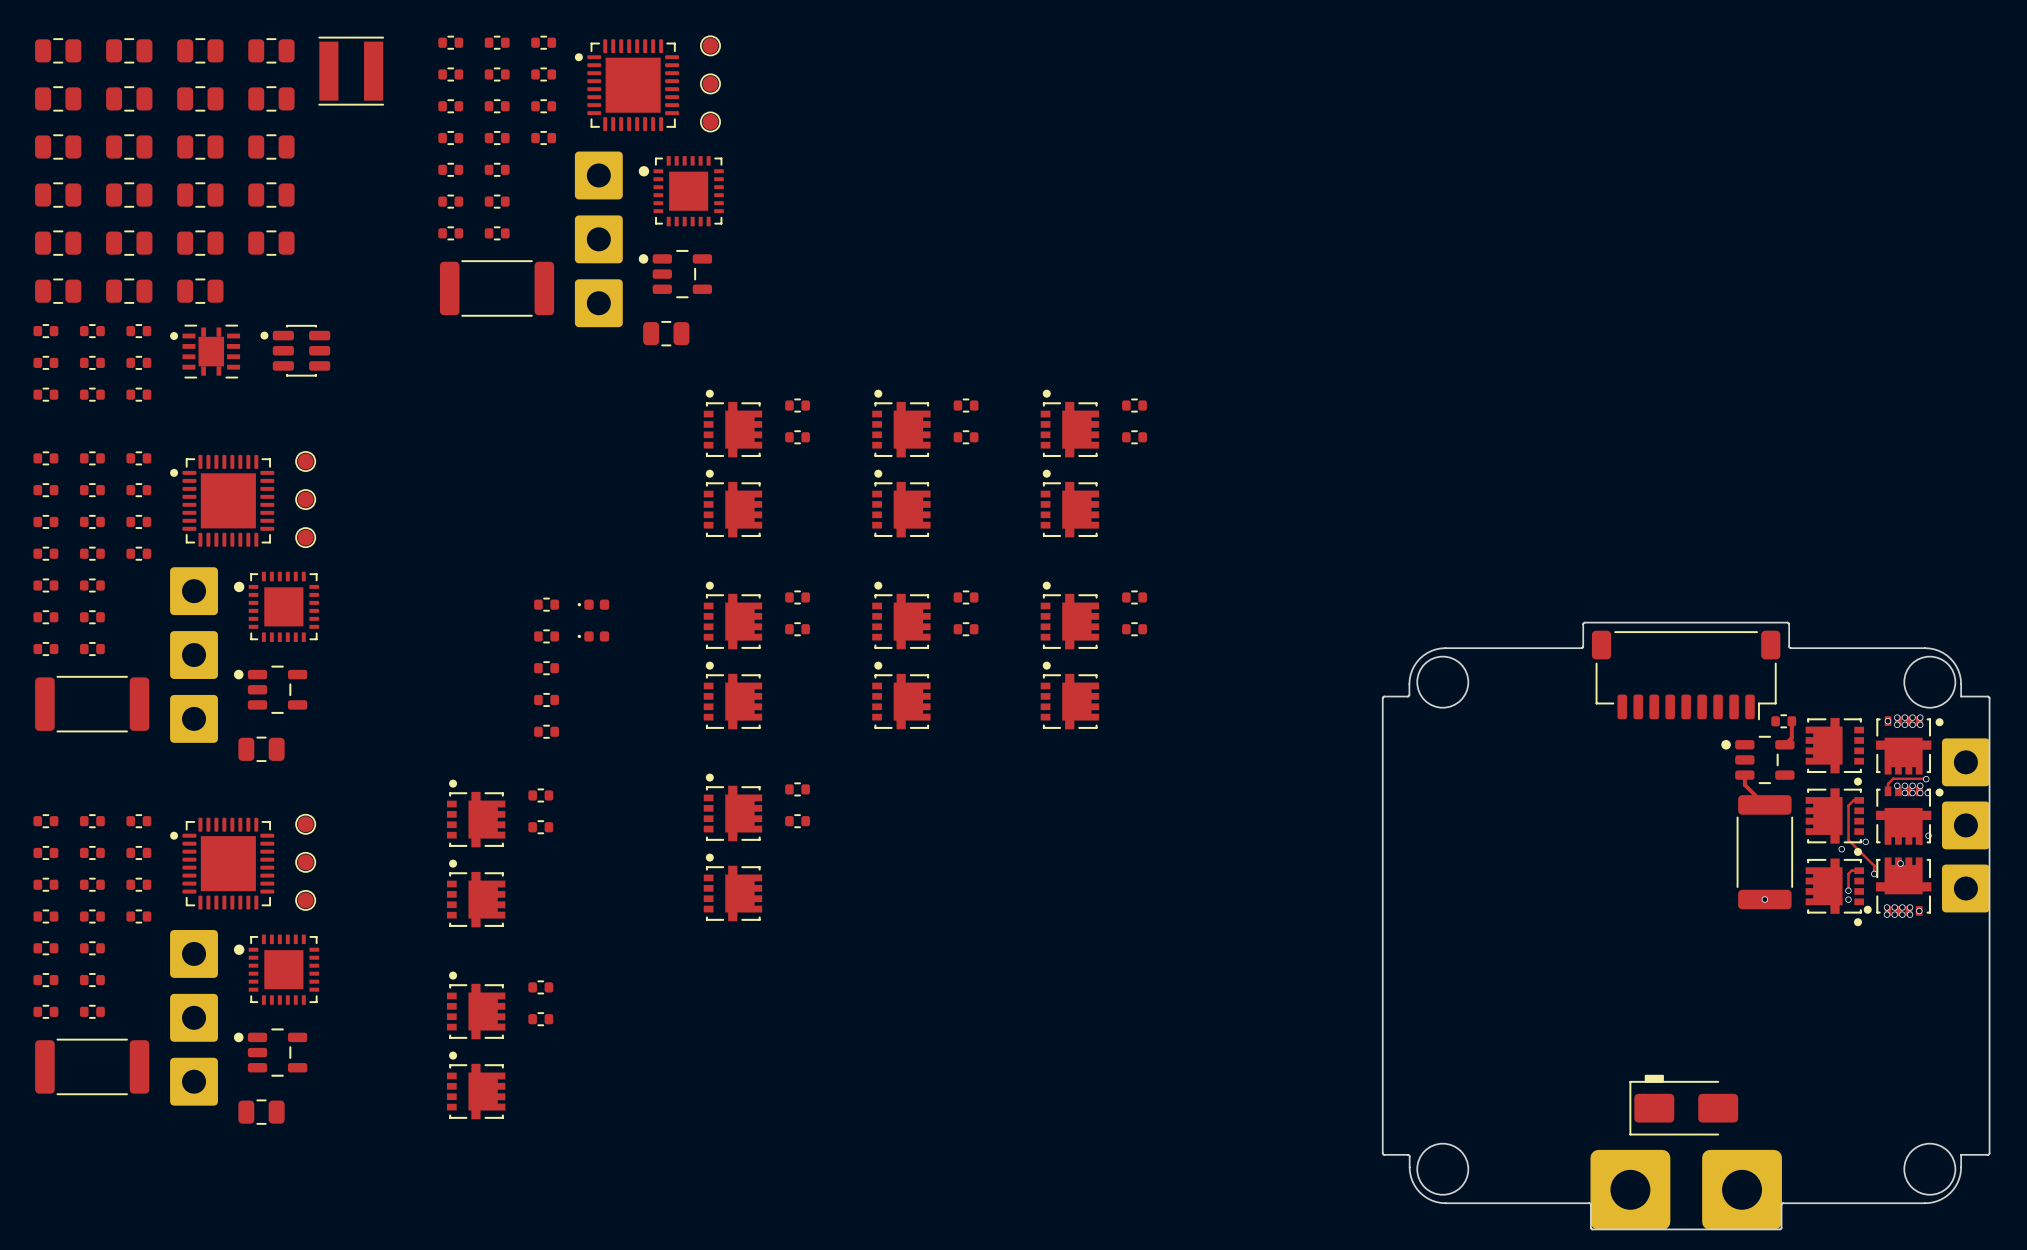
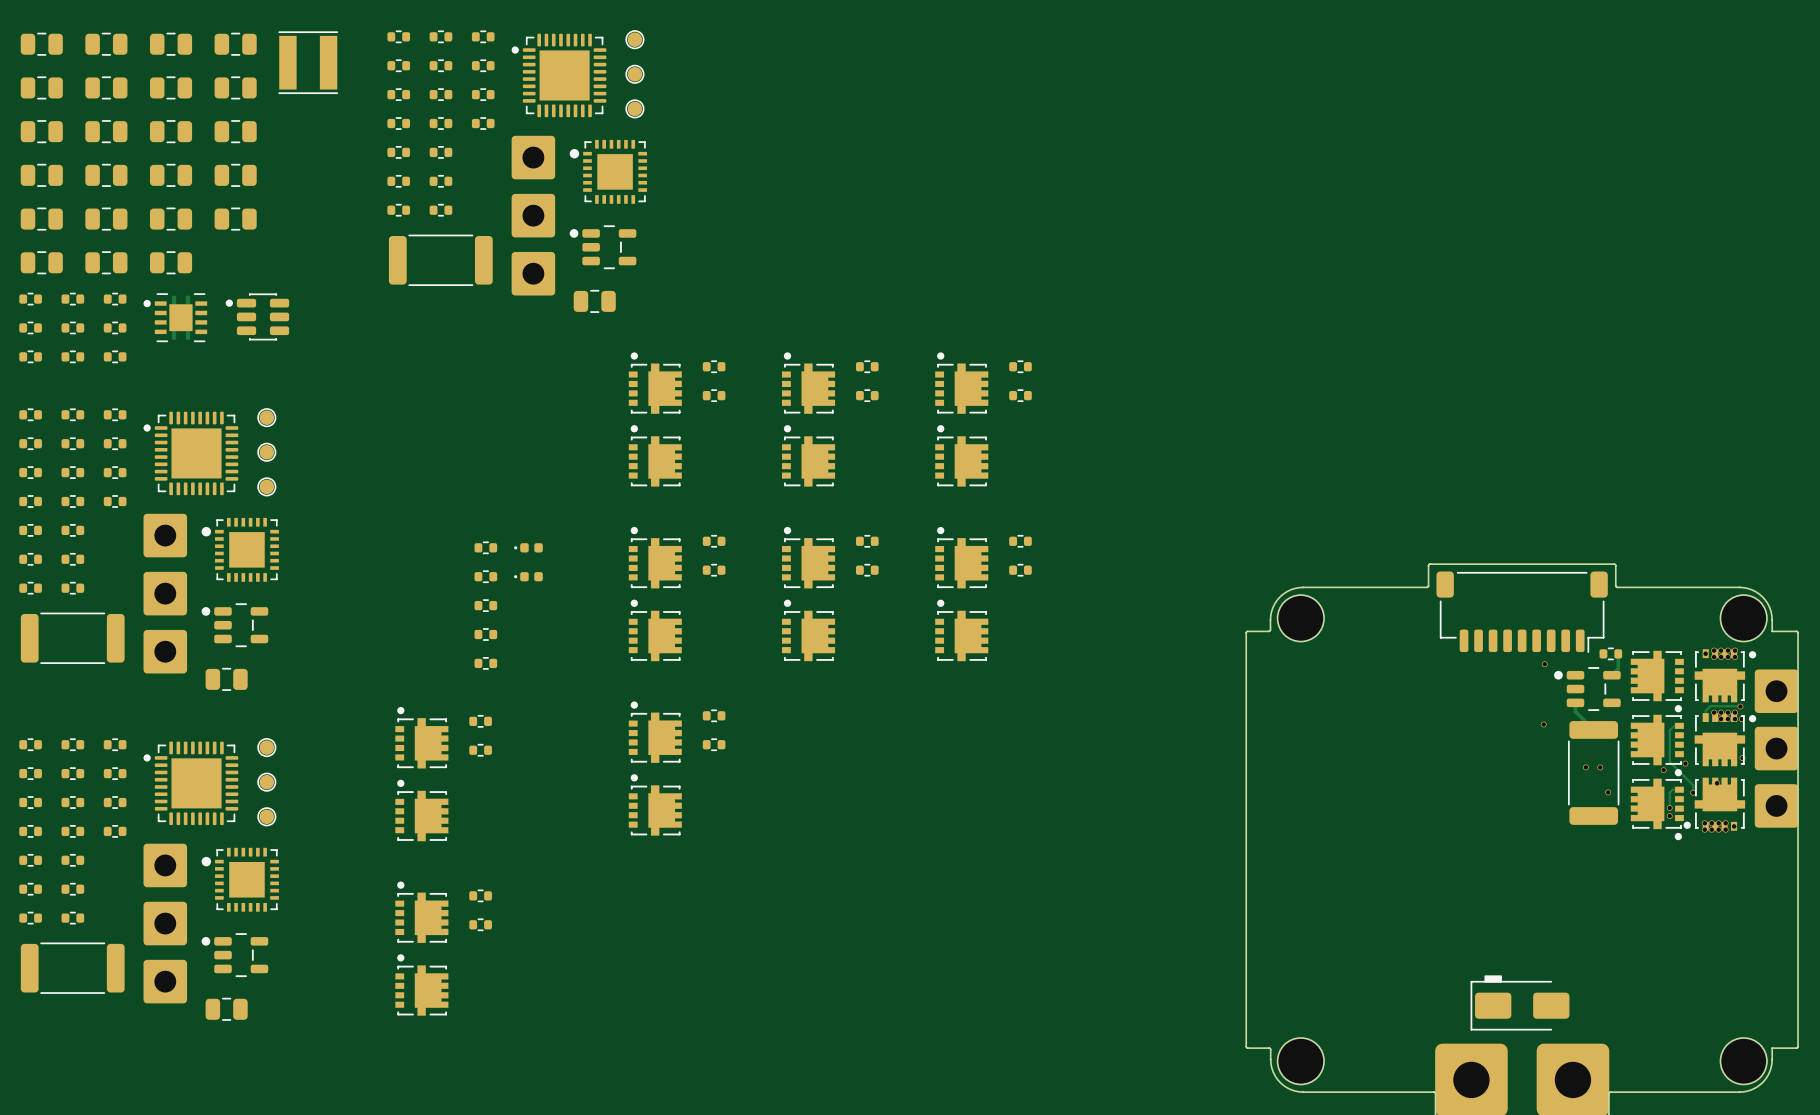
via: none -> (1544, 664)
via: none -> (1543, 724)
via: none -> (1585, 767)
via: none -> (1600, 767)
via: none -> (1608, 792)
via: (1764, 899) -> none

